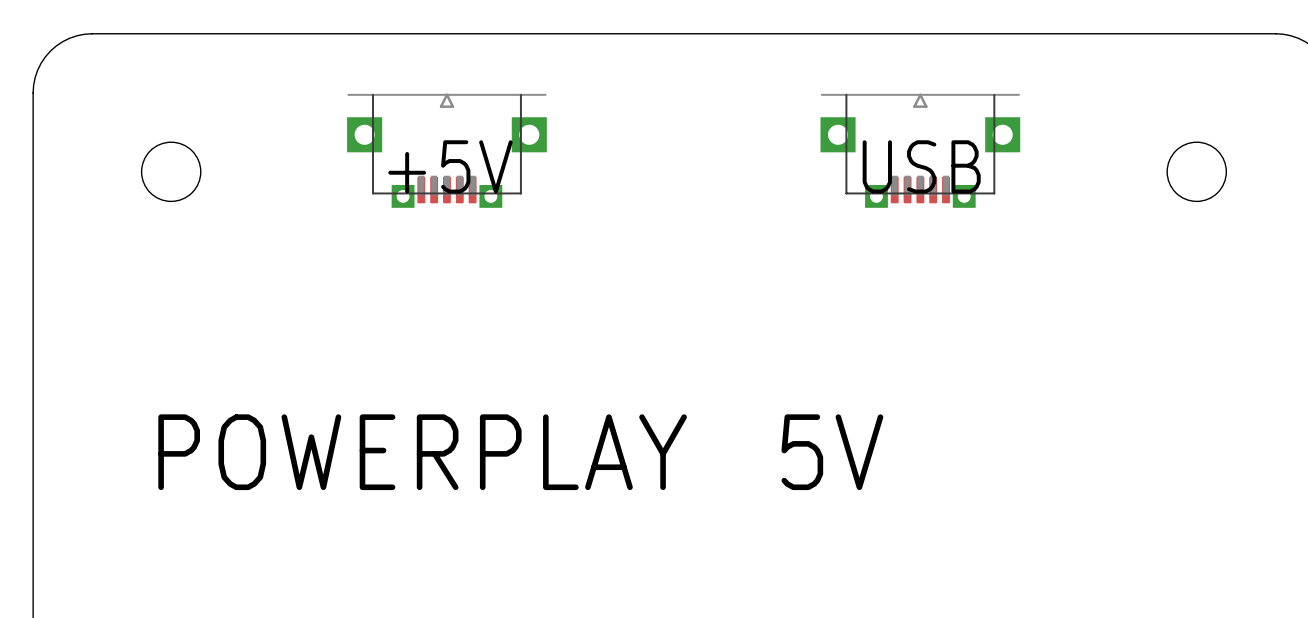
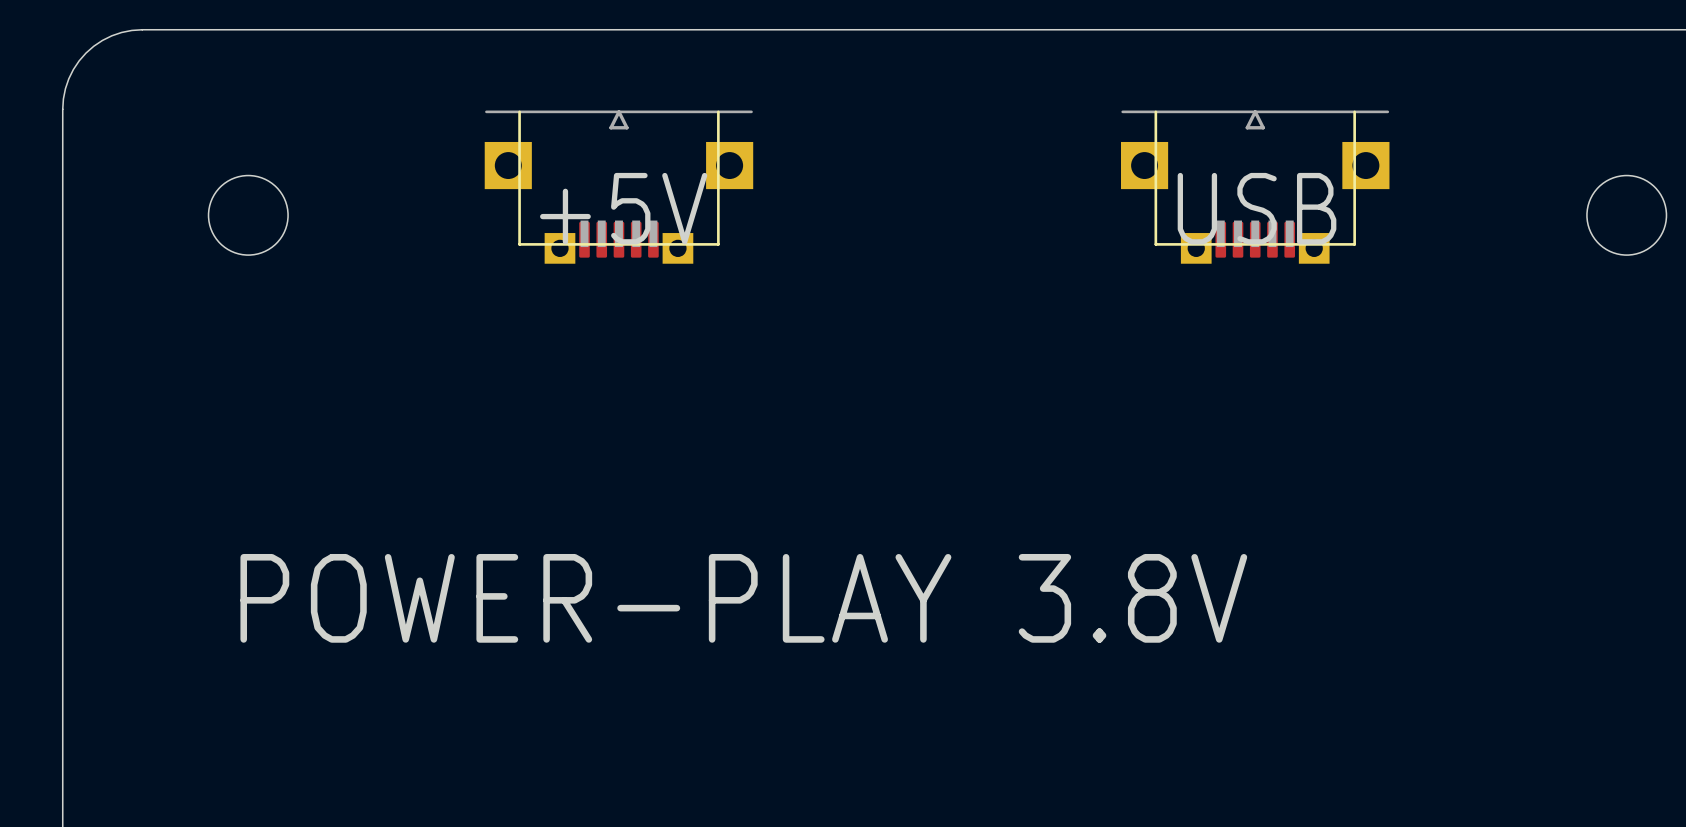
text: POWERPLAY (422, 452) -> POWER-PLAY 3.8V (743, 598)
text: 5V (832, 452) -> none

